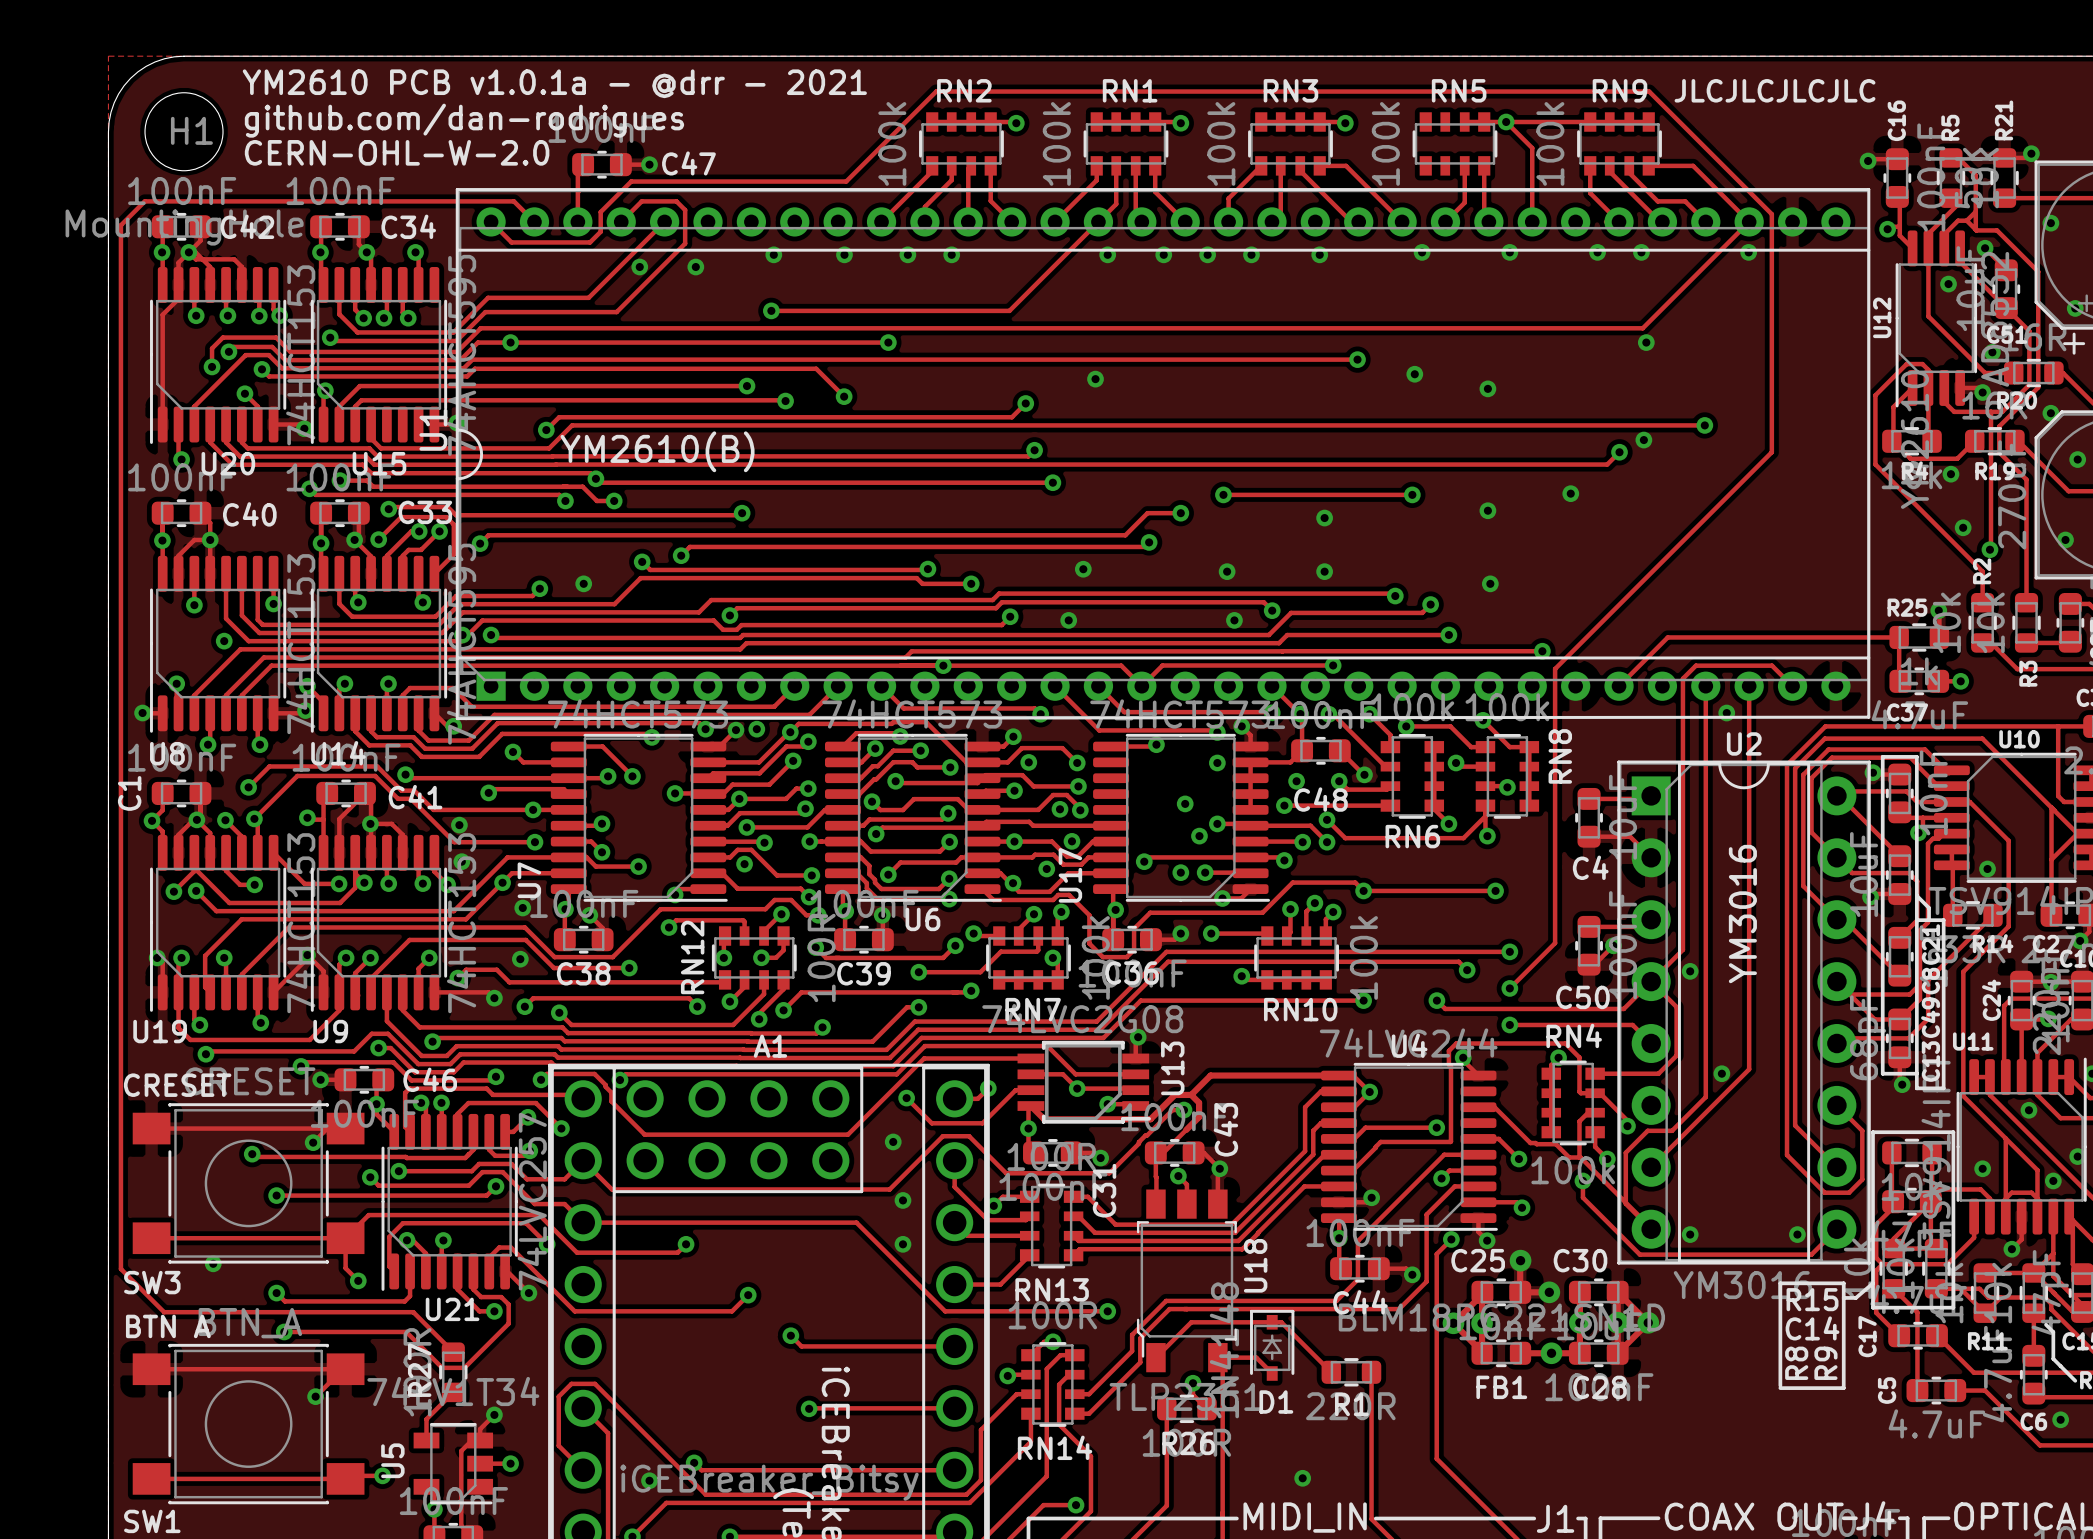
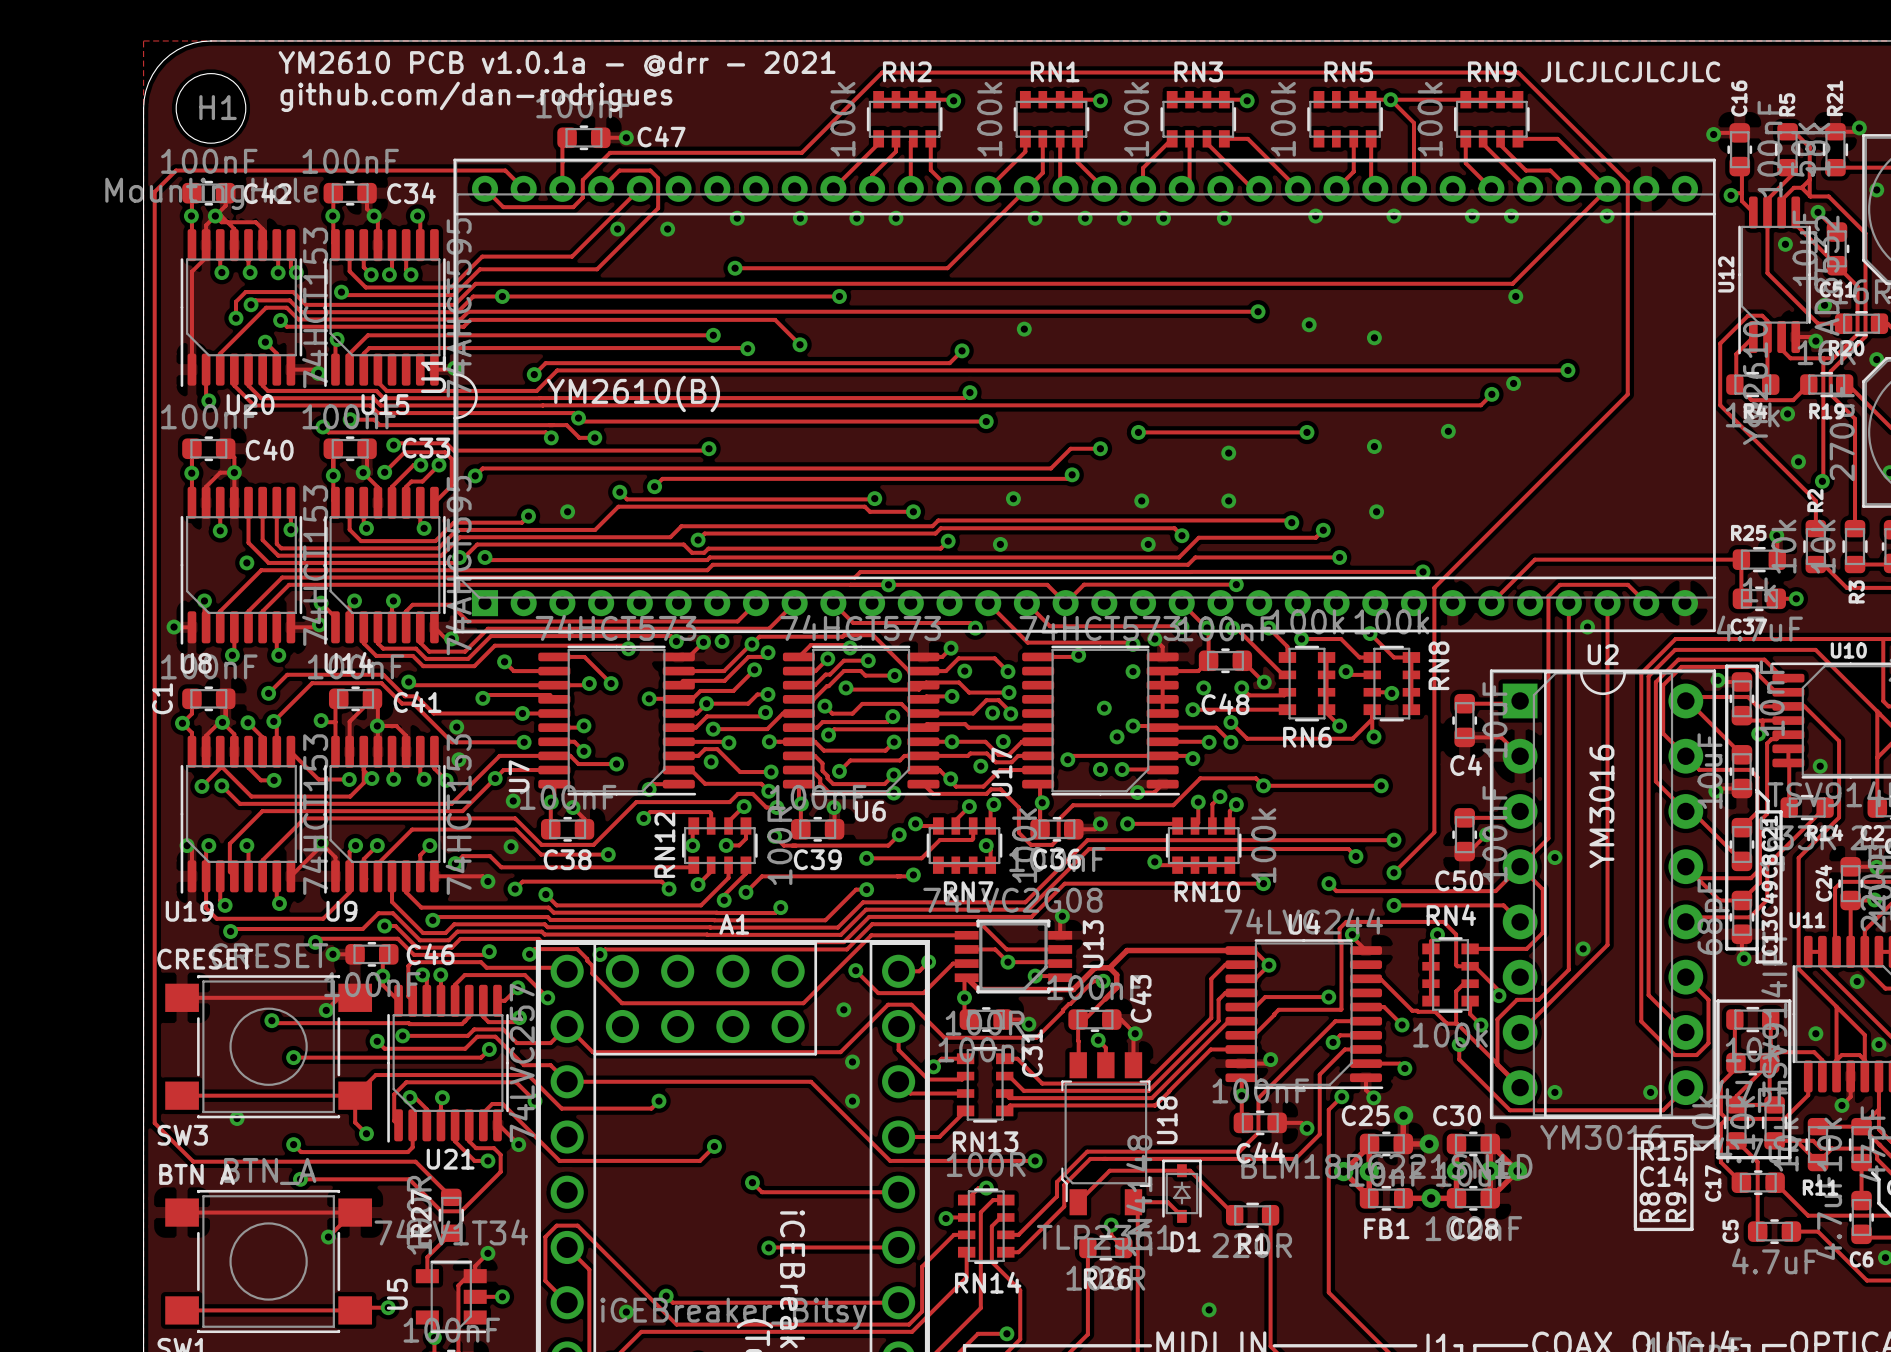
text position: YM2610 PCB v1.0.1a - @drr - 2021 (554, 83) -> YM2610 PCB v1.0.1a - @drr - 2021 (557, 63)
text position: github.com/dan-rodrigues (464, 120) -> github.com/dan-rodrigues (476, 96)
text: CERN-OHL-W-2.0 (397, 152) -> none

